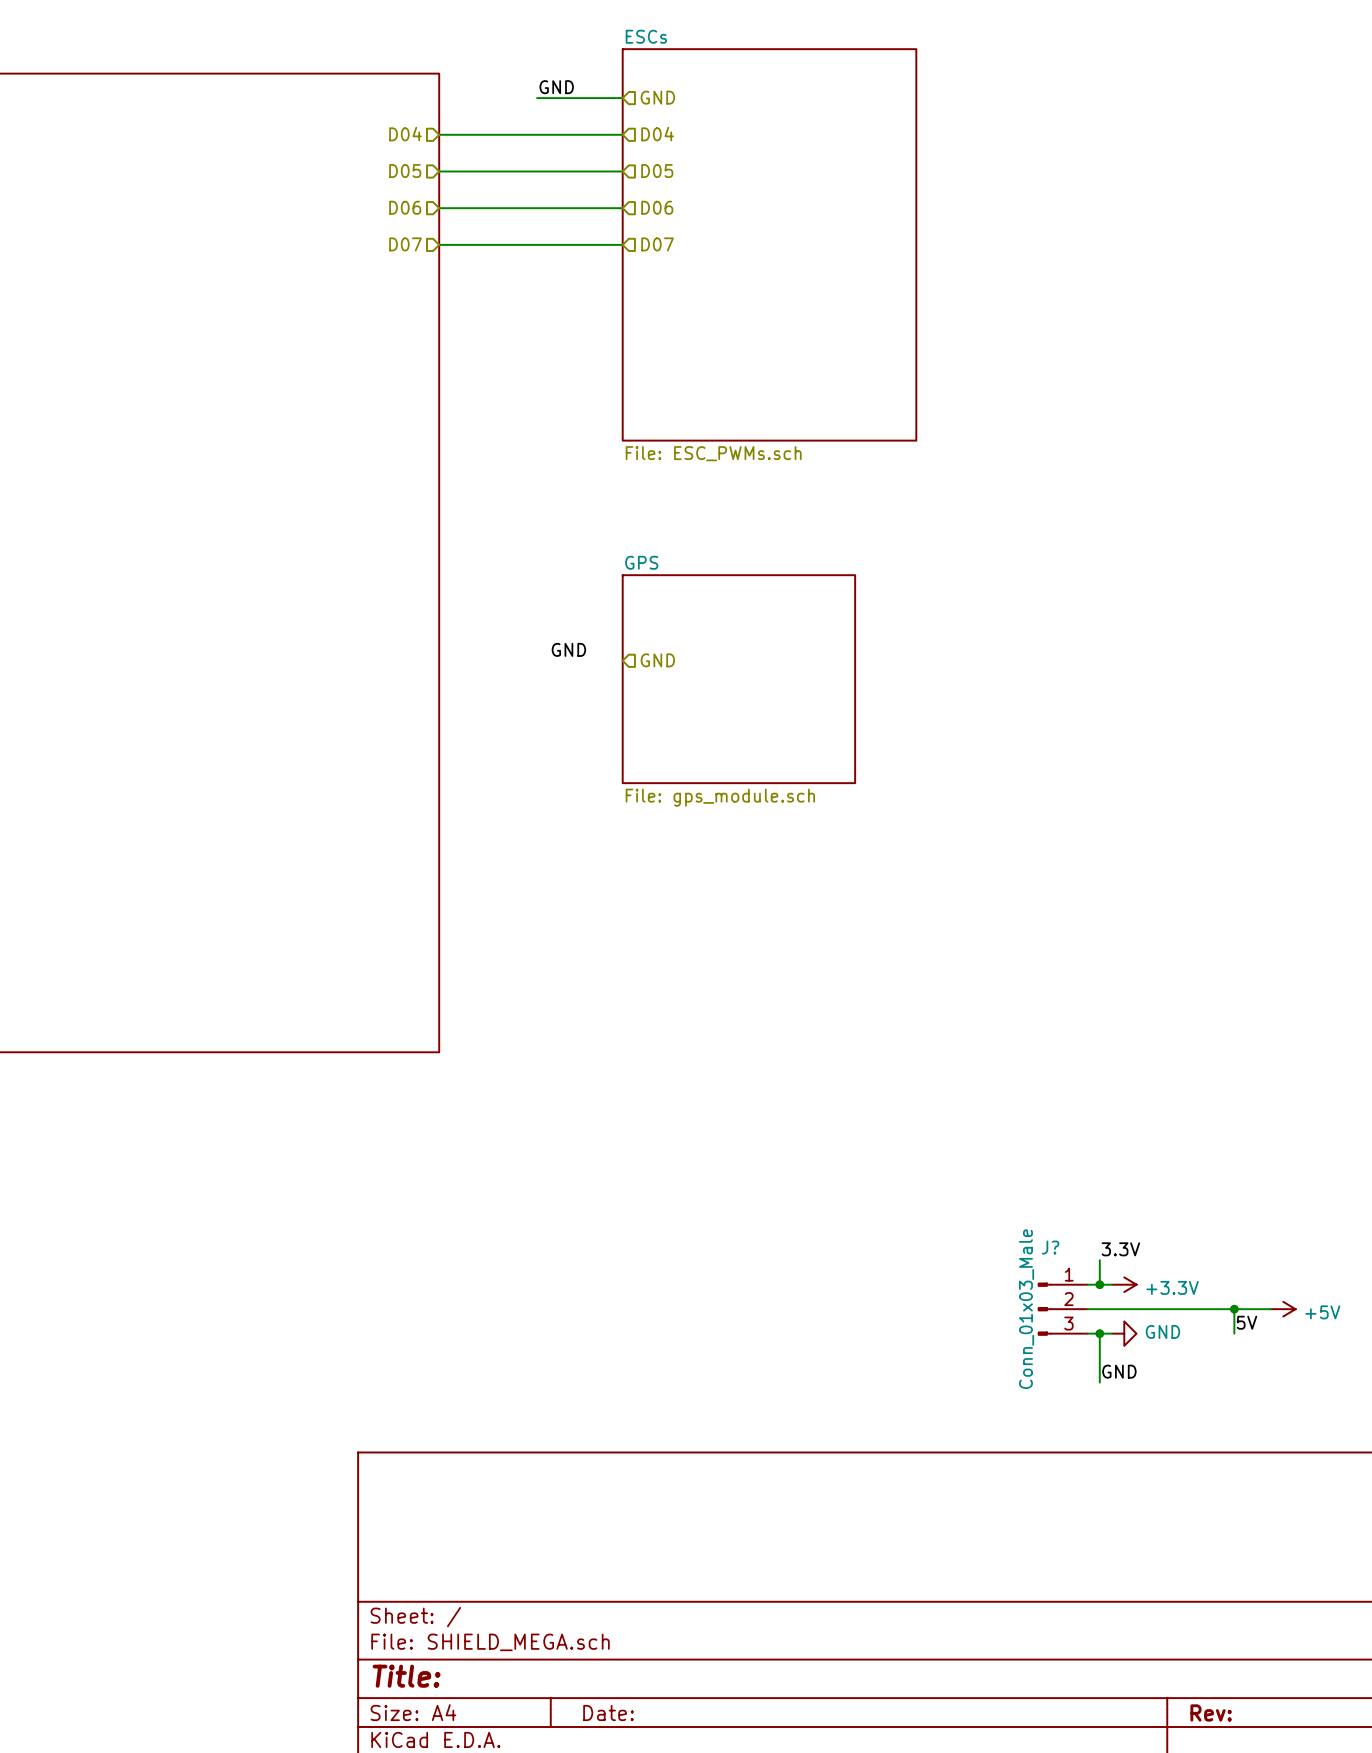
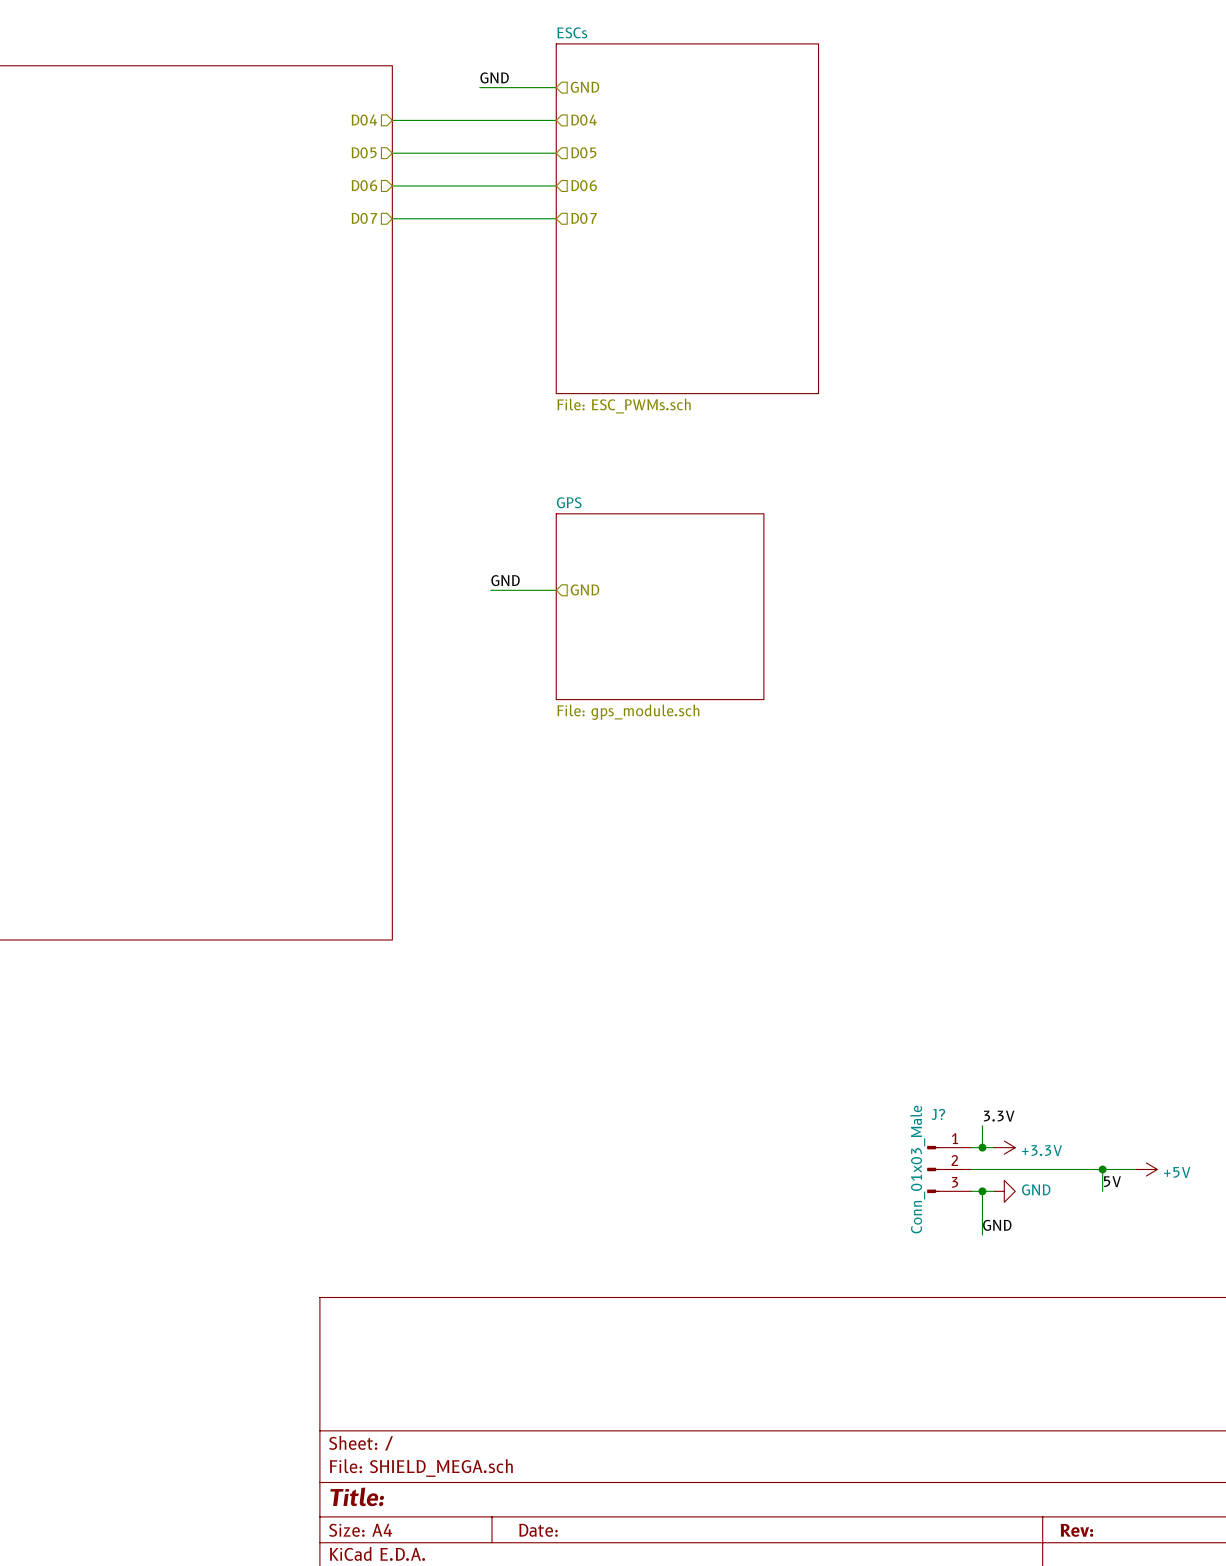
wire: none -> (490, 590) (556, 590)

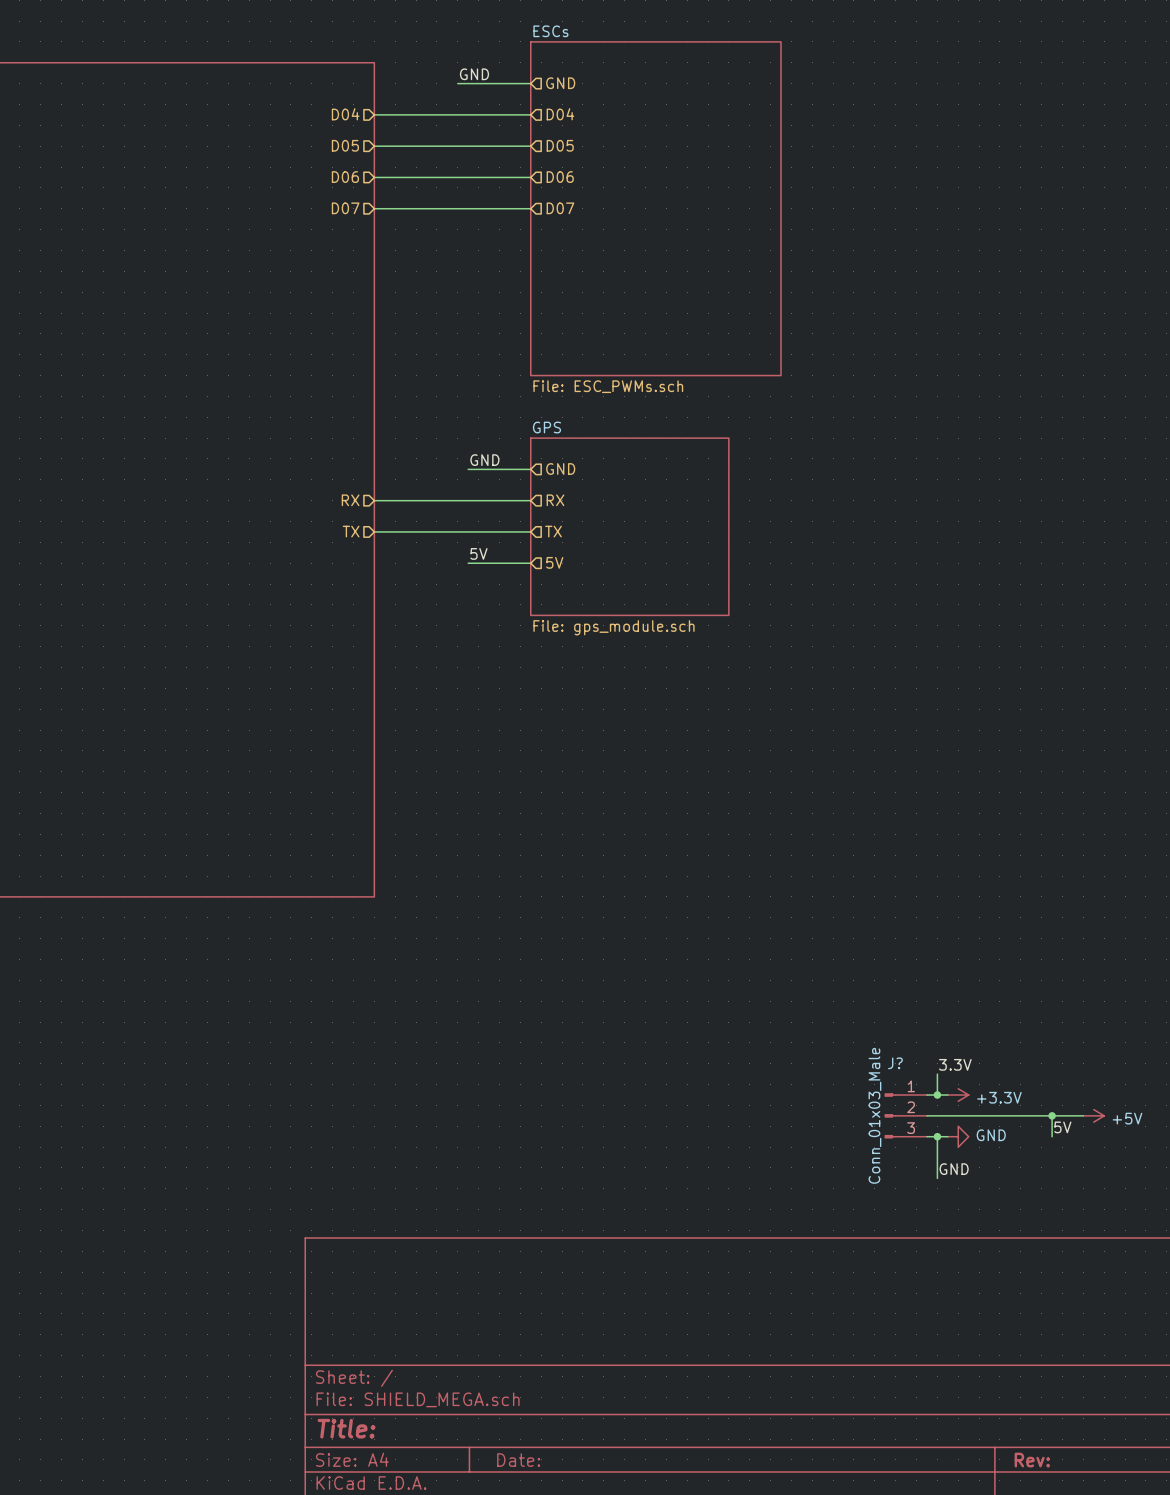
label: none -> GND (484, 460)
wire: none -> (468, 469) (530, 469)
hierarchical label: none -> GND (560, 469)
hierarchical label: none -> RX (350, 500)
wire: none -> (374, 500) (530, 500)
hierarchical label: none -> RX (555, 500)
hierarchical label: none -> TX (351, 531)
wire: none -> (374, 531) (530, 531)
hierarchical label: none -> TX (553, 531)
label: GND (505, 580) -> 5V (478, 553)
hierarchical label: GND (584, 589) -> 5V (554, 562)
sheet GPS position: (660, 606) -> (629, 526)

